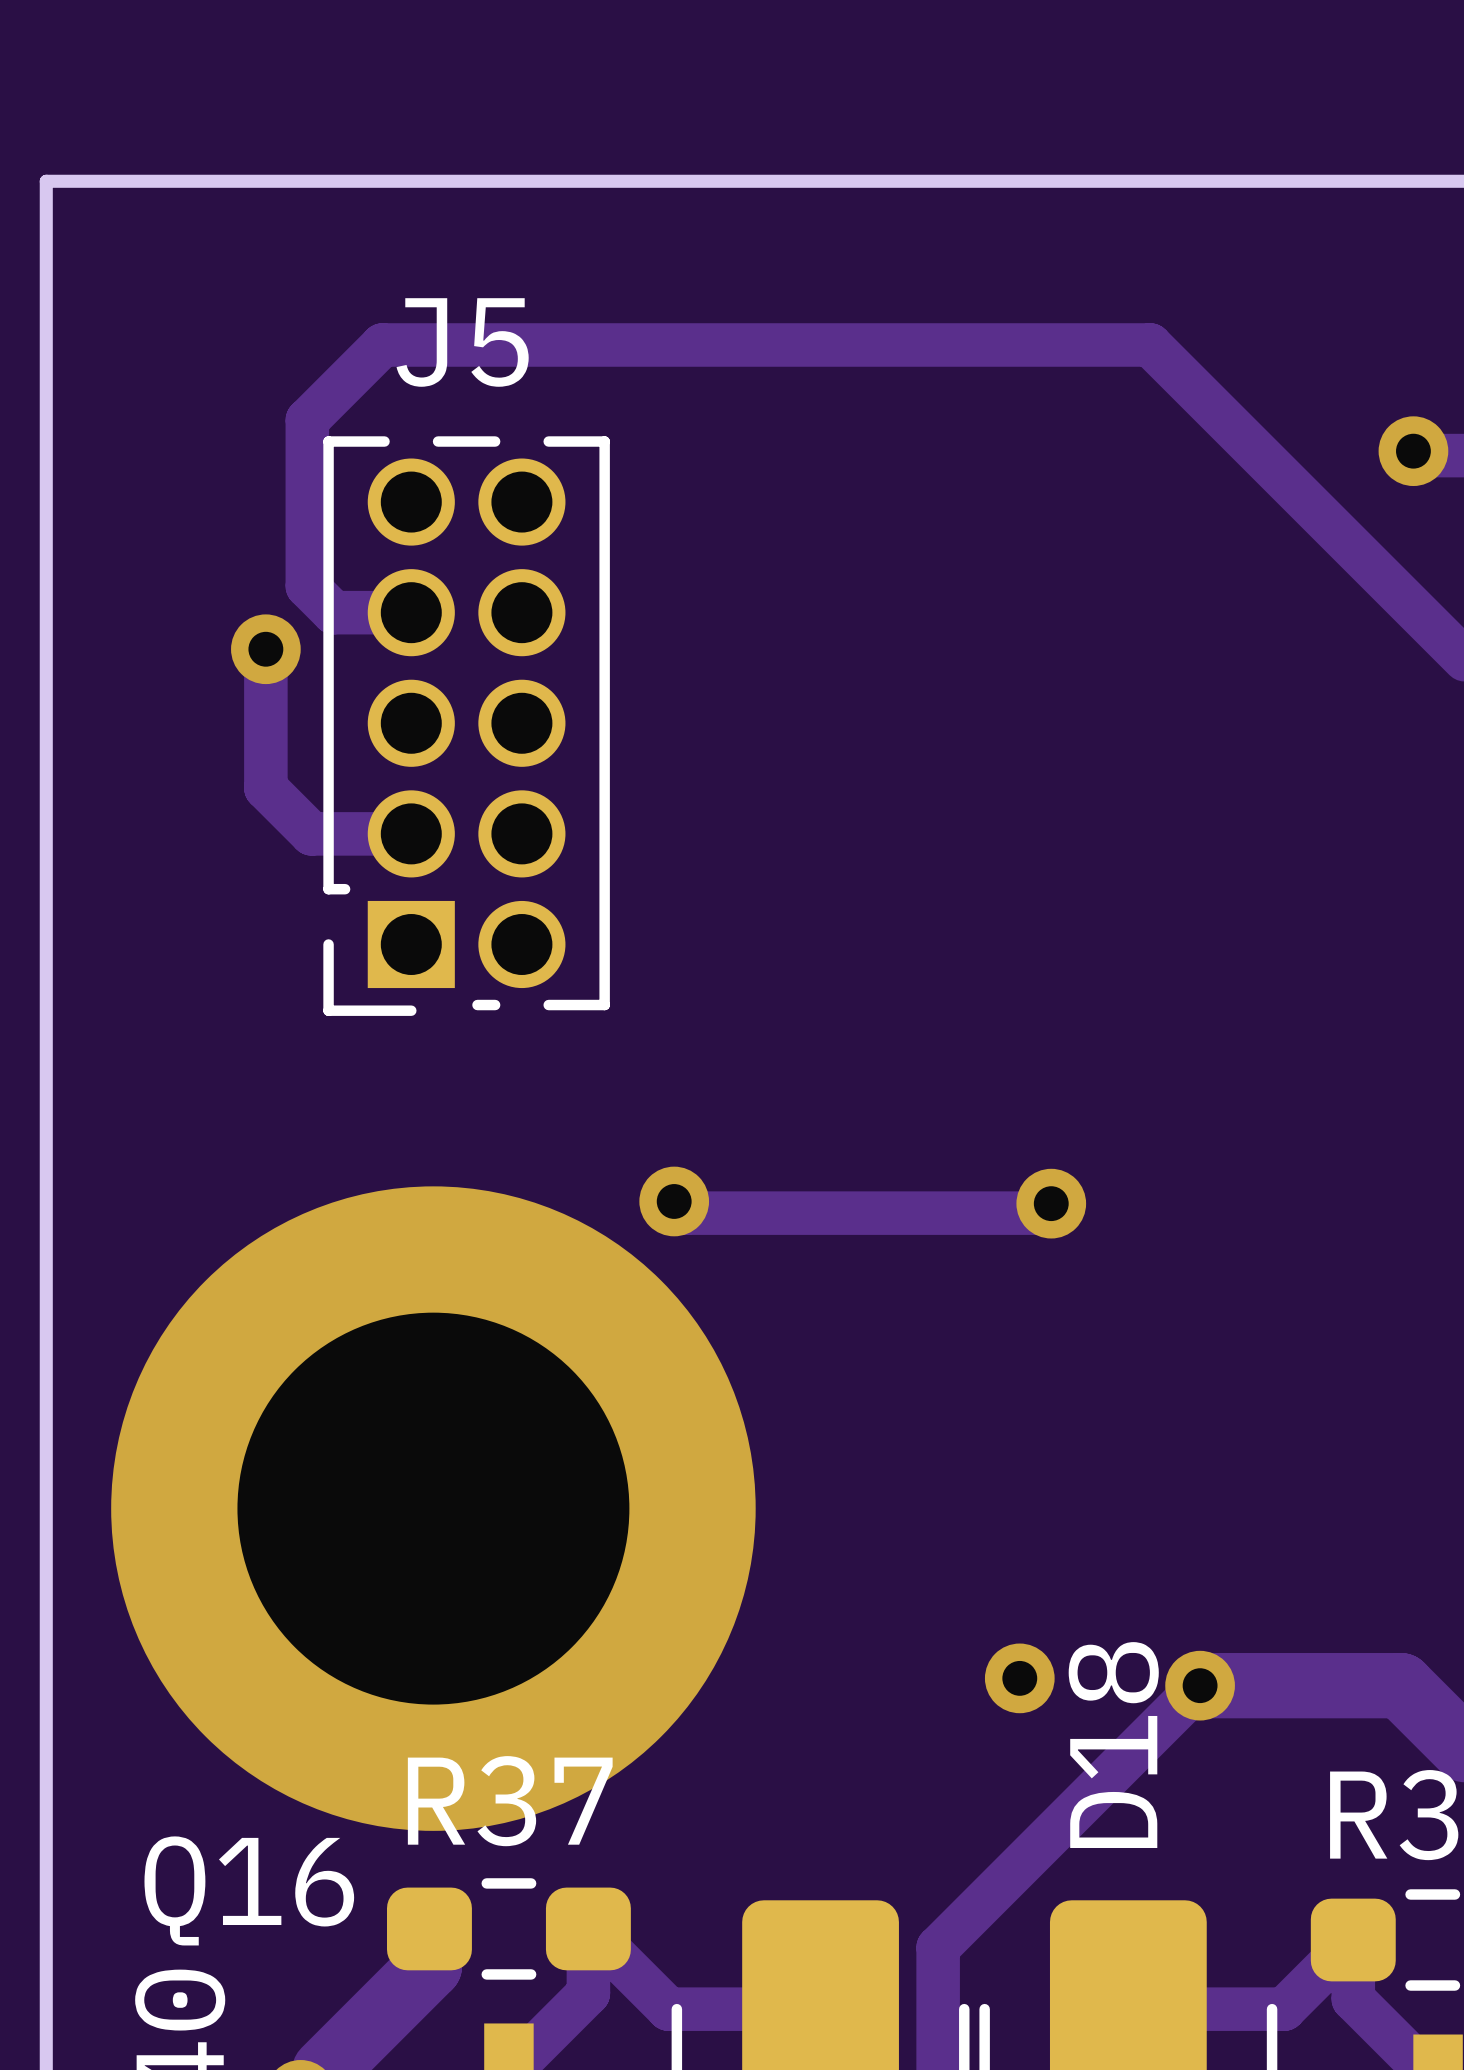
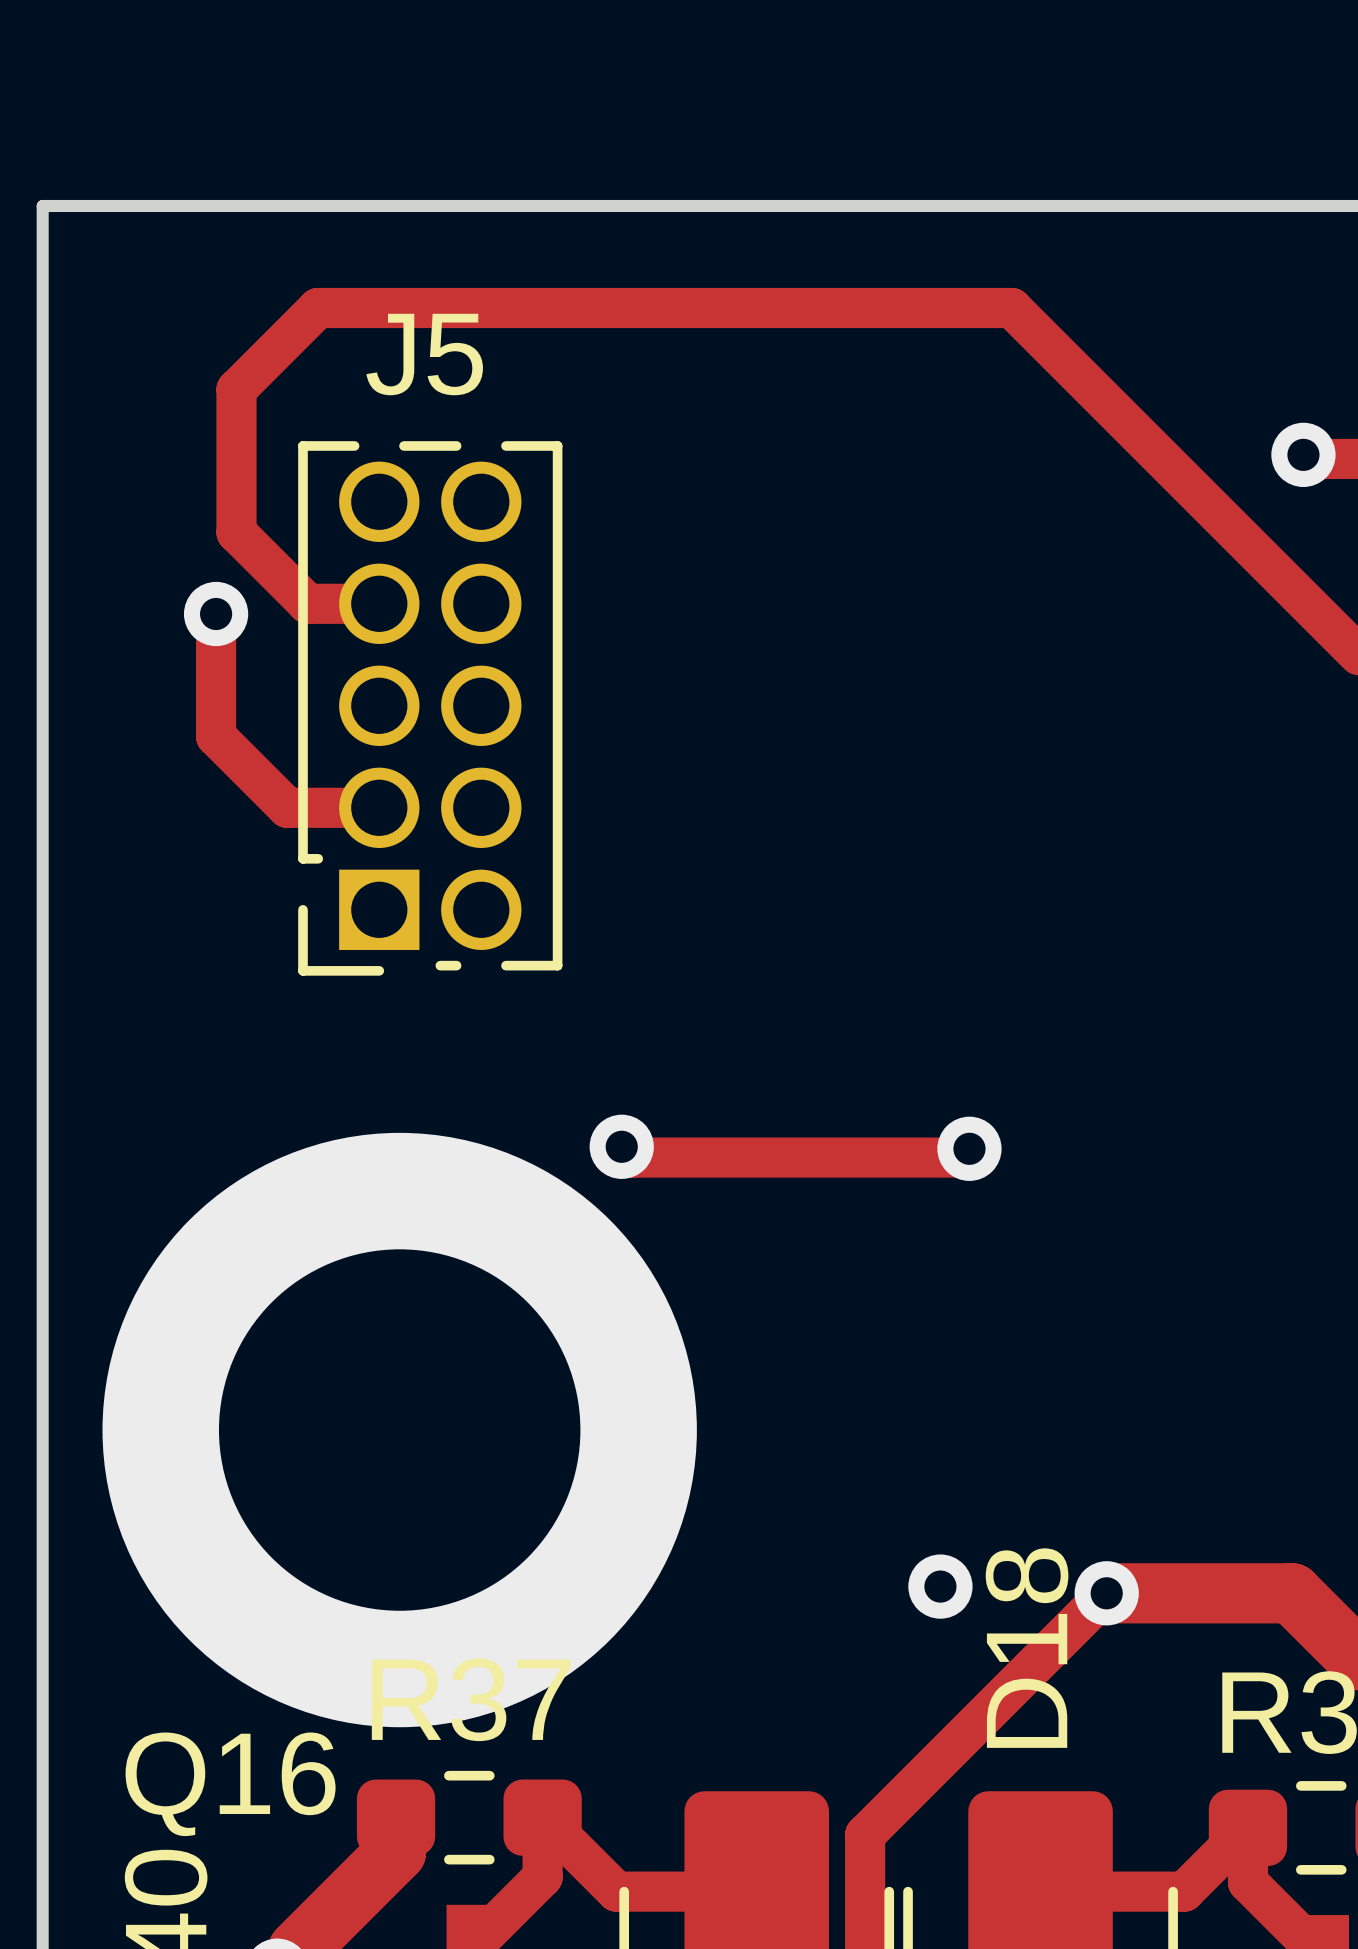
track: (1150, 344) (382, 344) (307, 420) (307, 586) -> (1060, 356) (1011, 307) (318, 307) (236, 389) (236, 532) (283, 579)
track: (265, 649) (265, 788) -> (216, 614) (216, 736) (245, 765)
via position: (265, 649) -> (216, 614)

